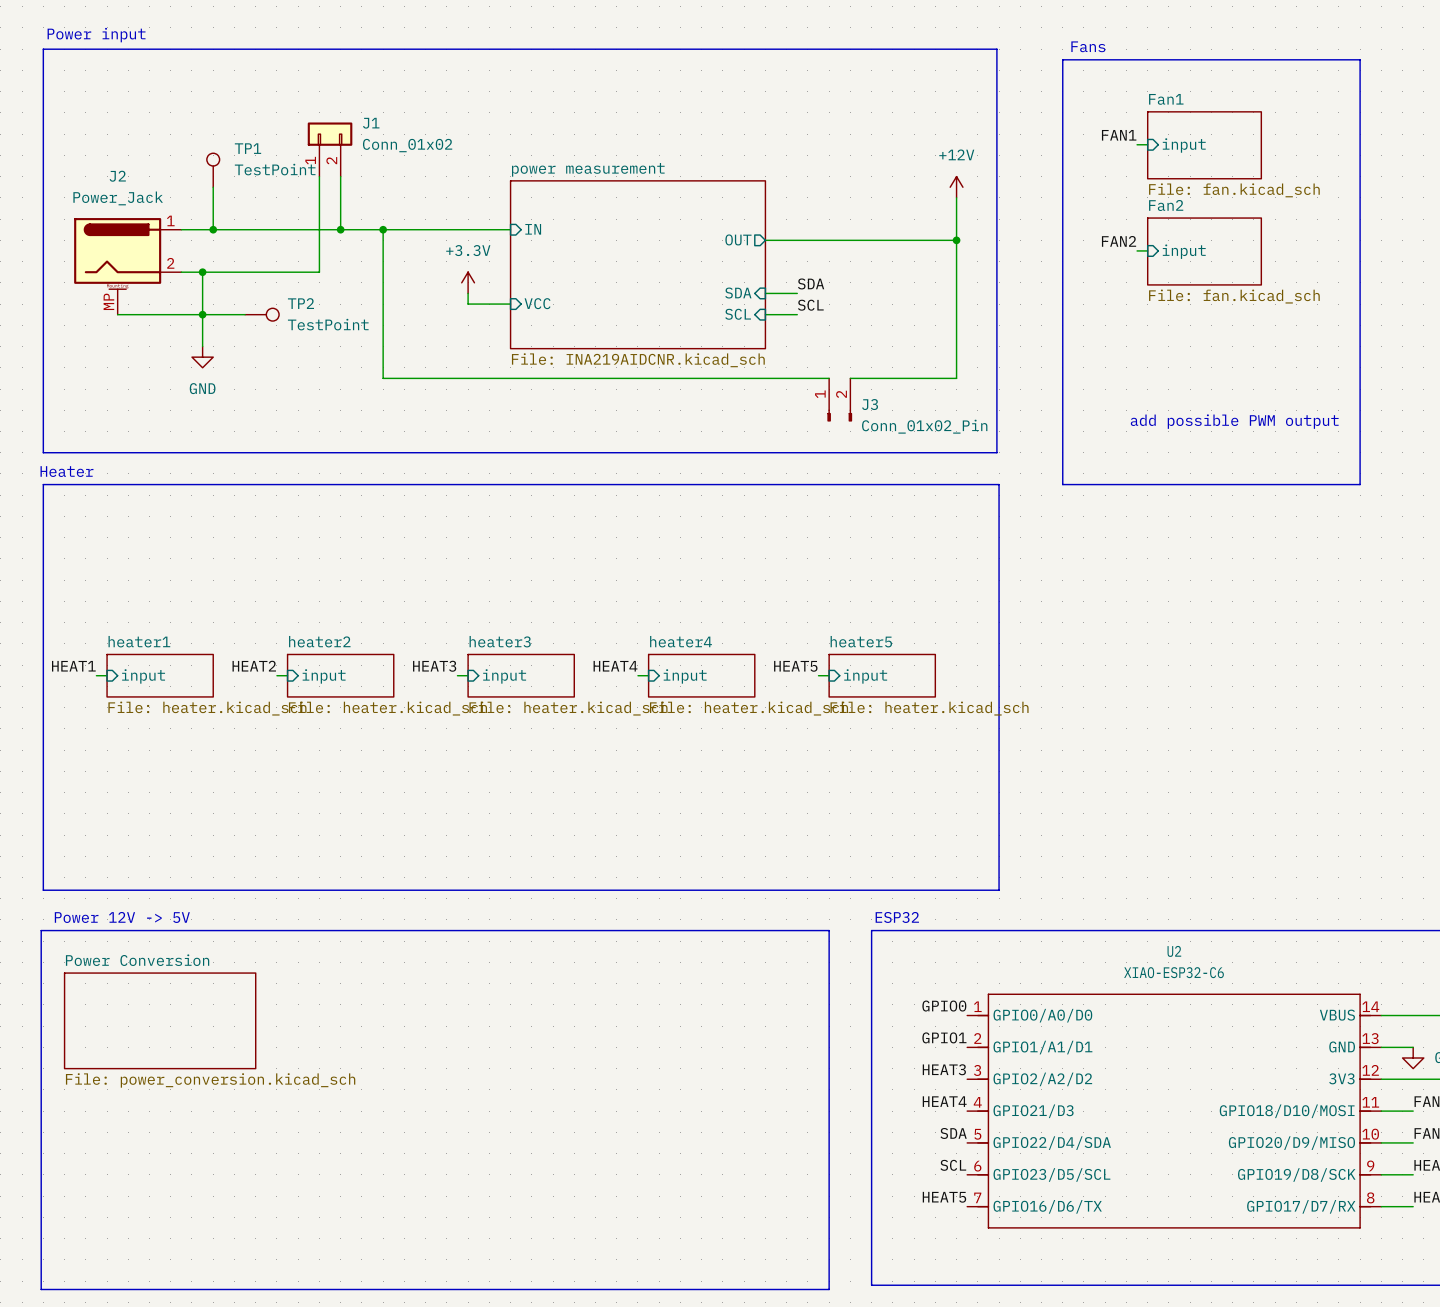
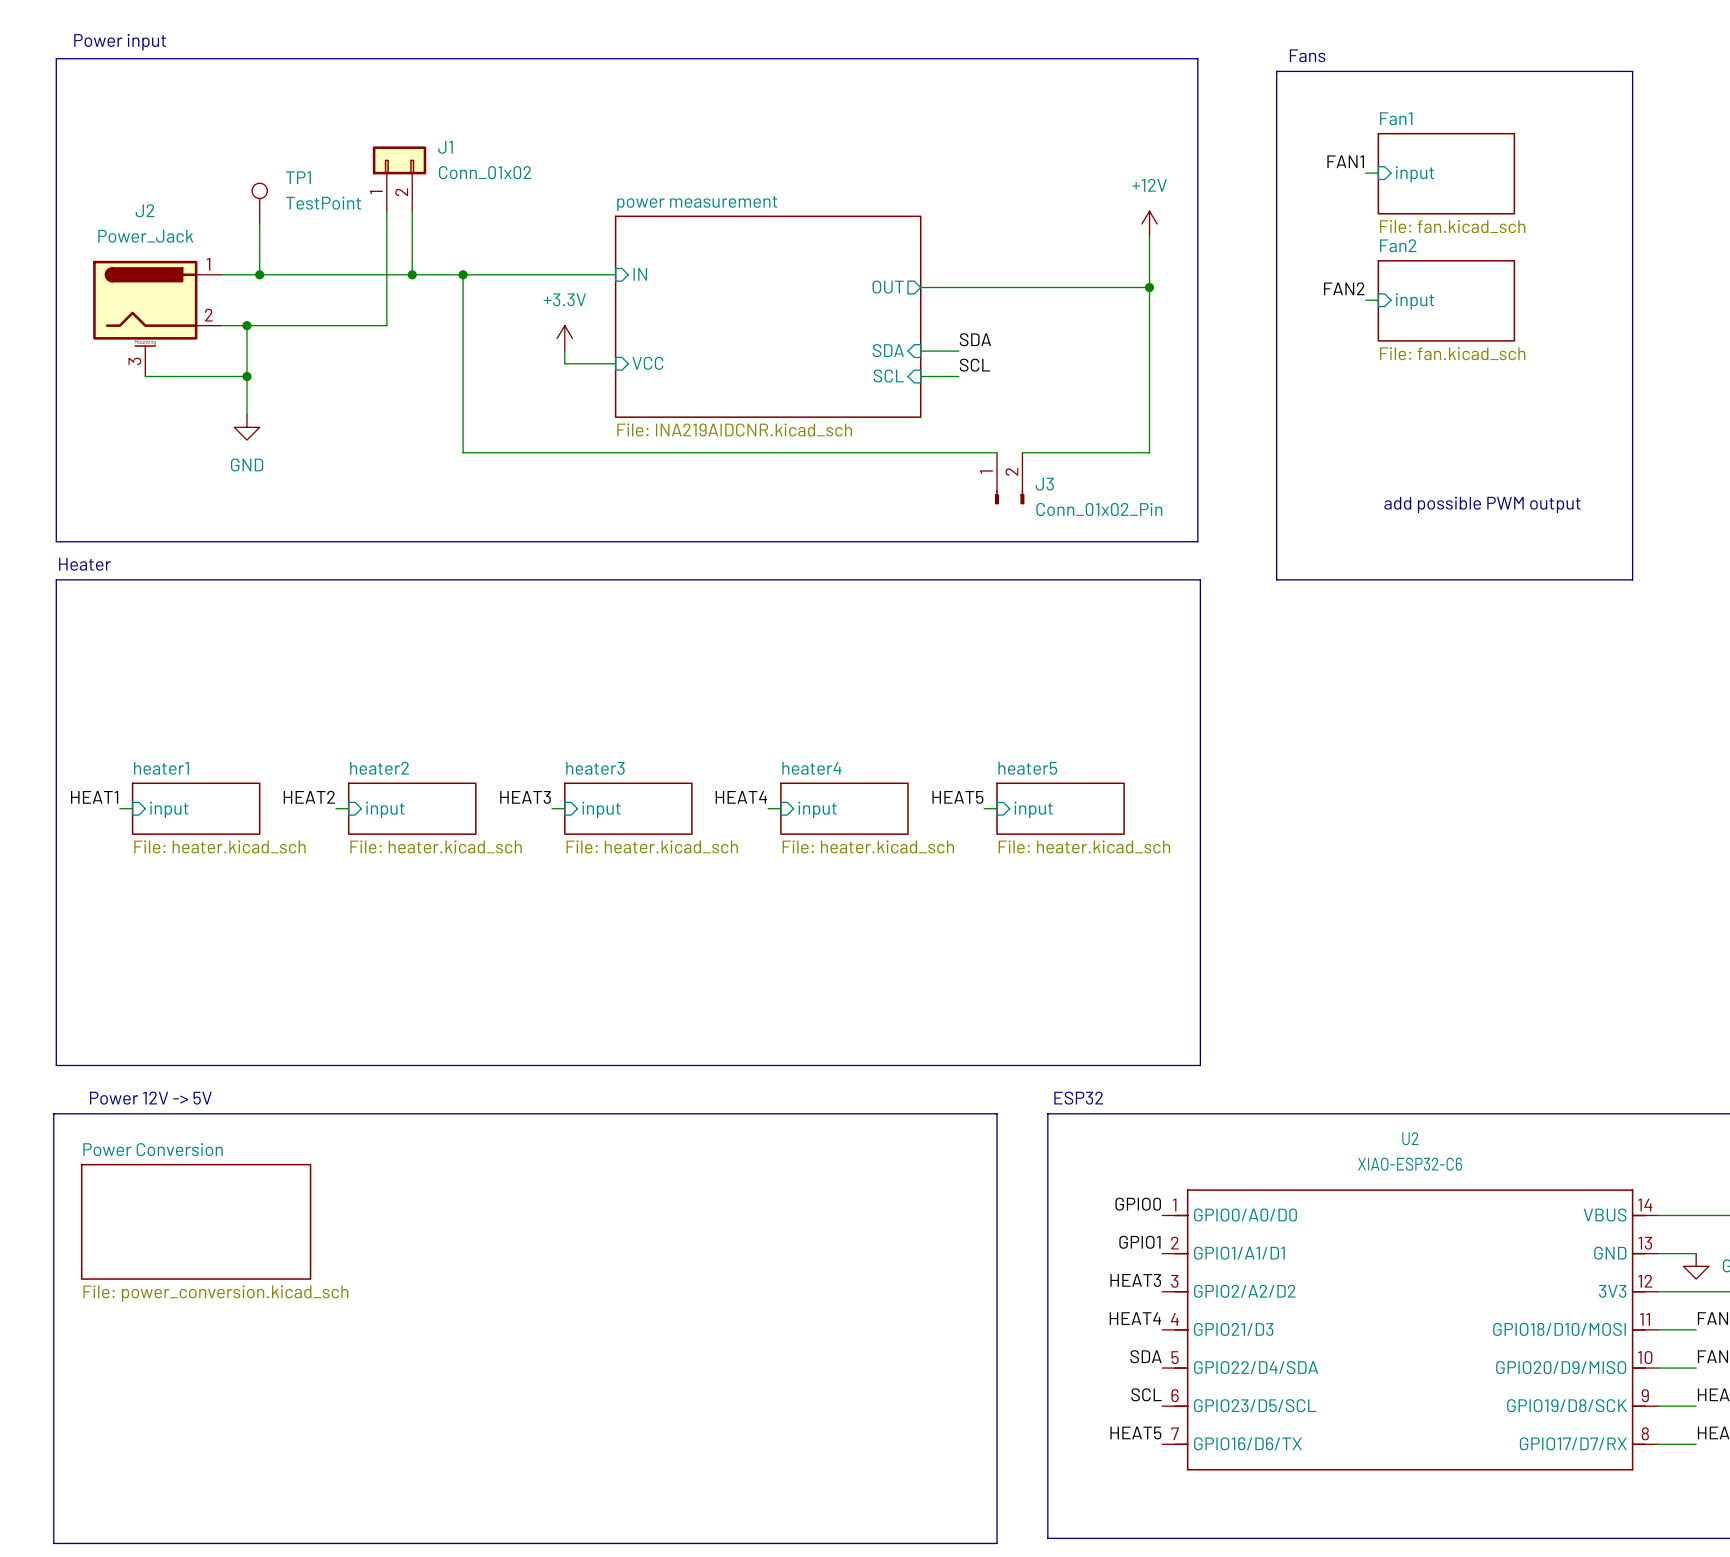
J2 pin number: MP (108, 301) -> 3 (134, 361)
wire: (202, 314) (245, 314) -> none
TP2: TestPoint (262, 314) -> none

